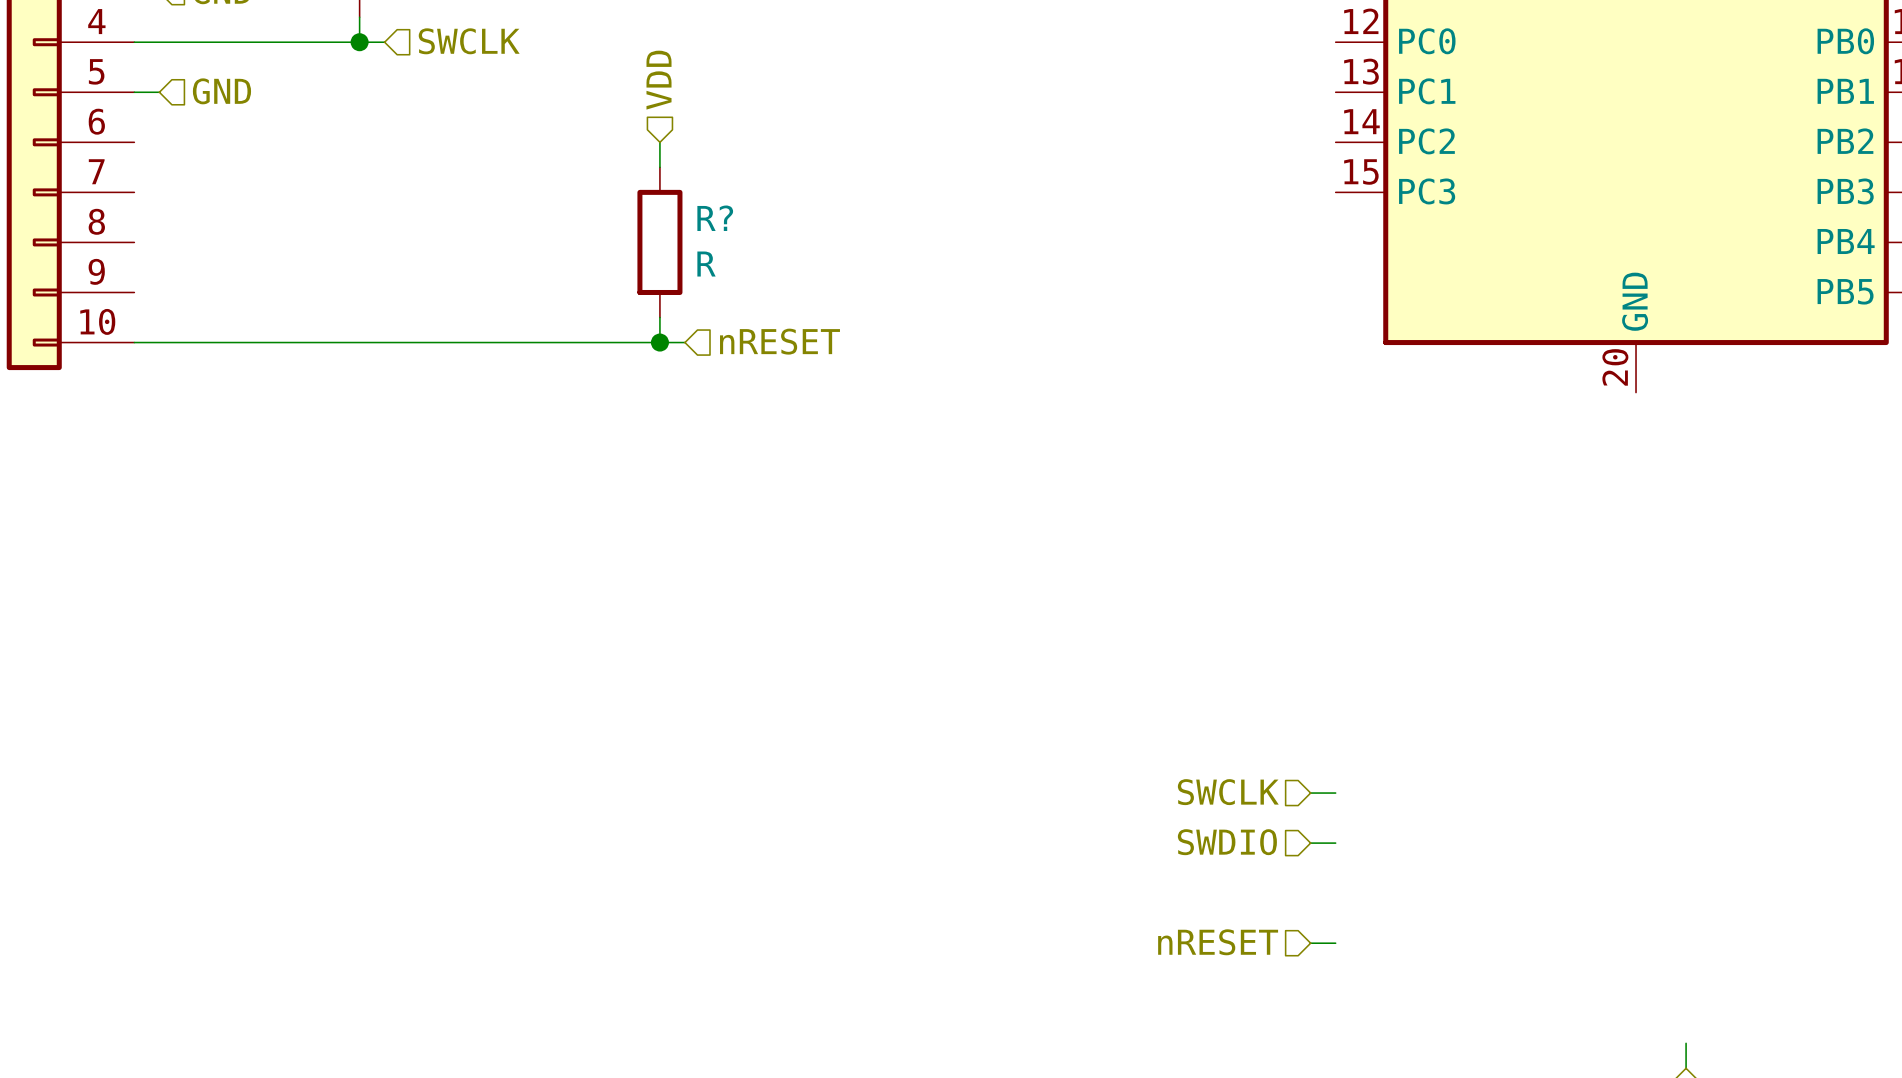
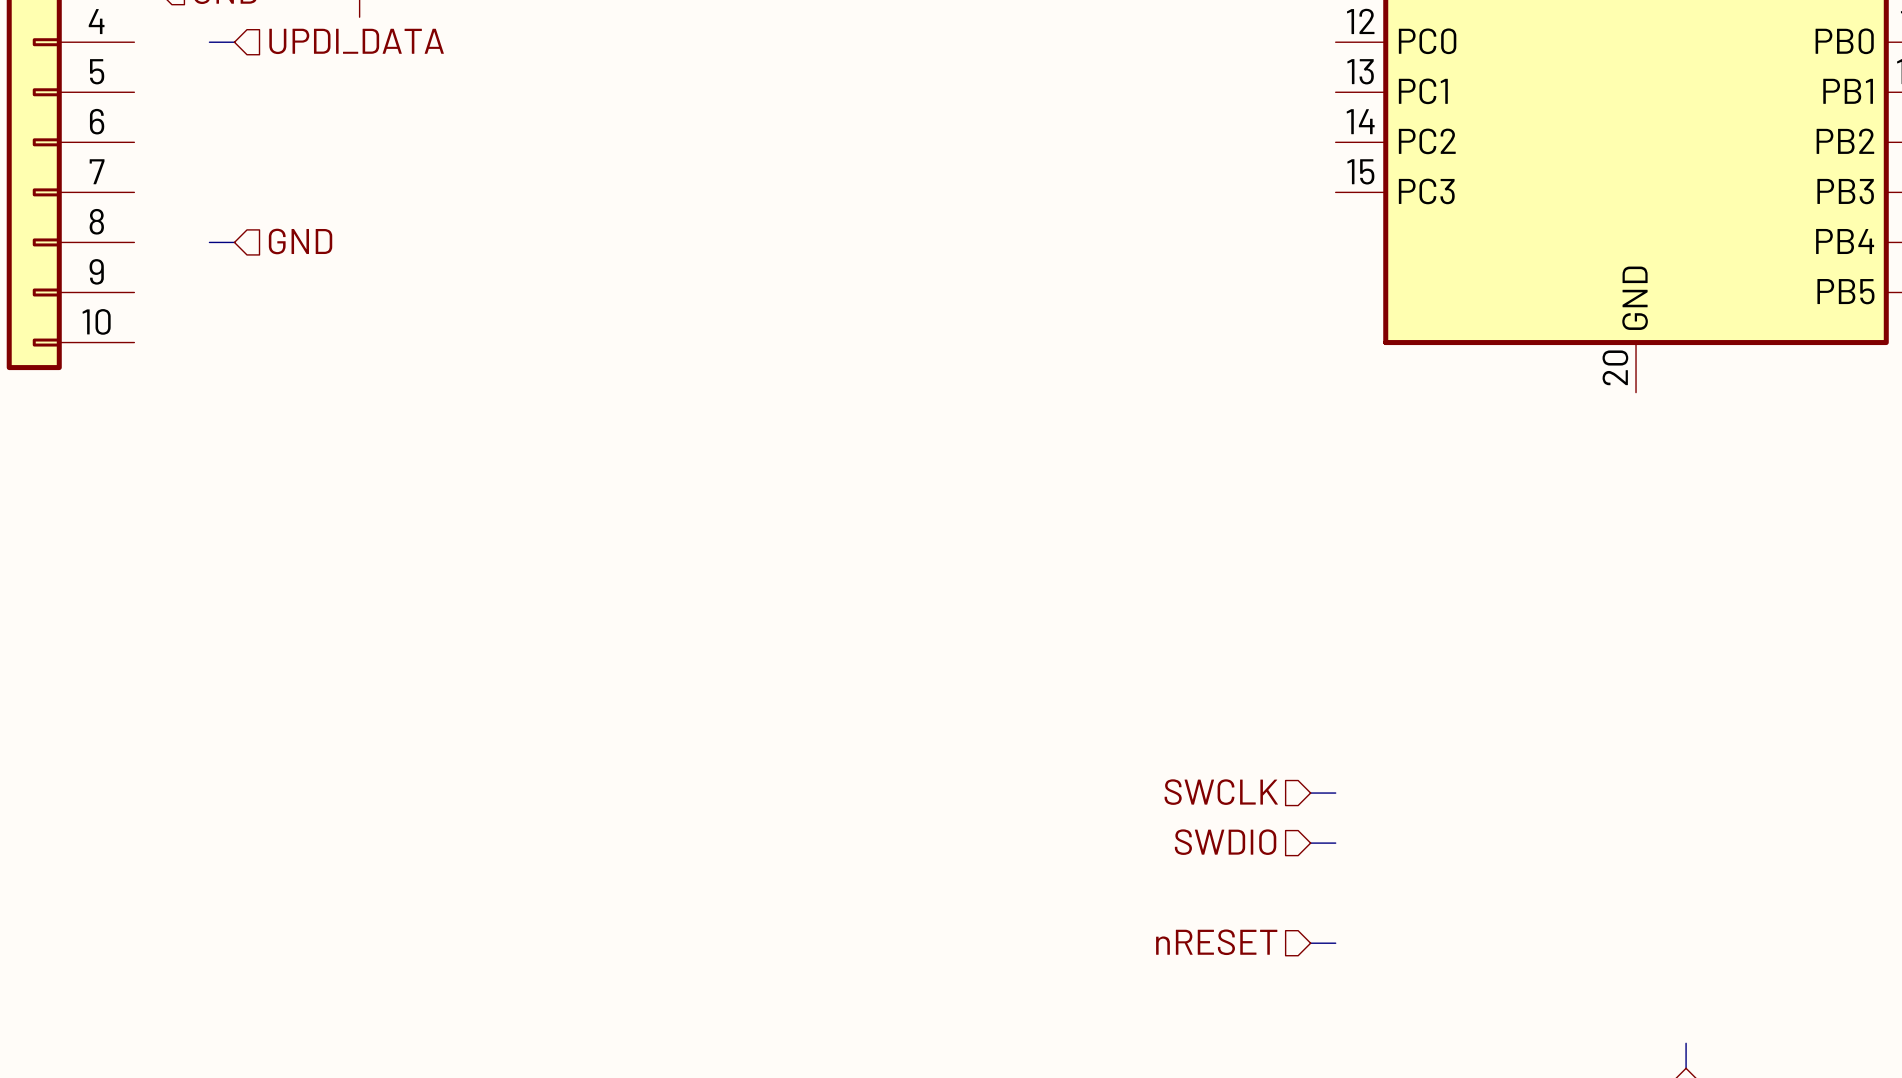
wire: (359, 17) (359, 42) -> none
hierarchical label: SWCLK (469, 41) -> none
wire: (134, 42) (209, 42) -> none
wire: (234, 42) (384, 42) -> none
junction: (359, 42) -> none
hierarchical label: none -> UPDI_DATA (356, 41)
hierarchical label: VDD (659, 80) -> none
hierarchical label position: GND (221, 91) -> GND (300, 241)
wire: (134, 92) (159, 92) -> (209, 242) (234, 242)
wire: (659, 142) (659, 167) -> none
R?: R (659, 242) -> none
wire: (659, 317) (659, 342) -> none
hierarchical label: nRESET (779, 341) -> none
wire: (134, 342) (684, 342) -> none
junction: (659, 342) -> none

